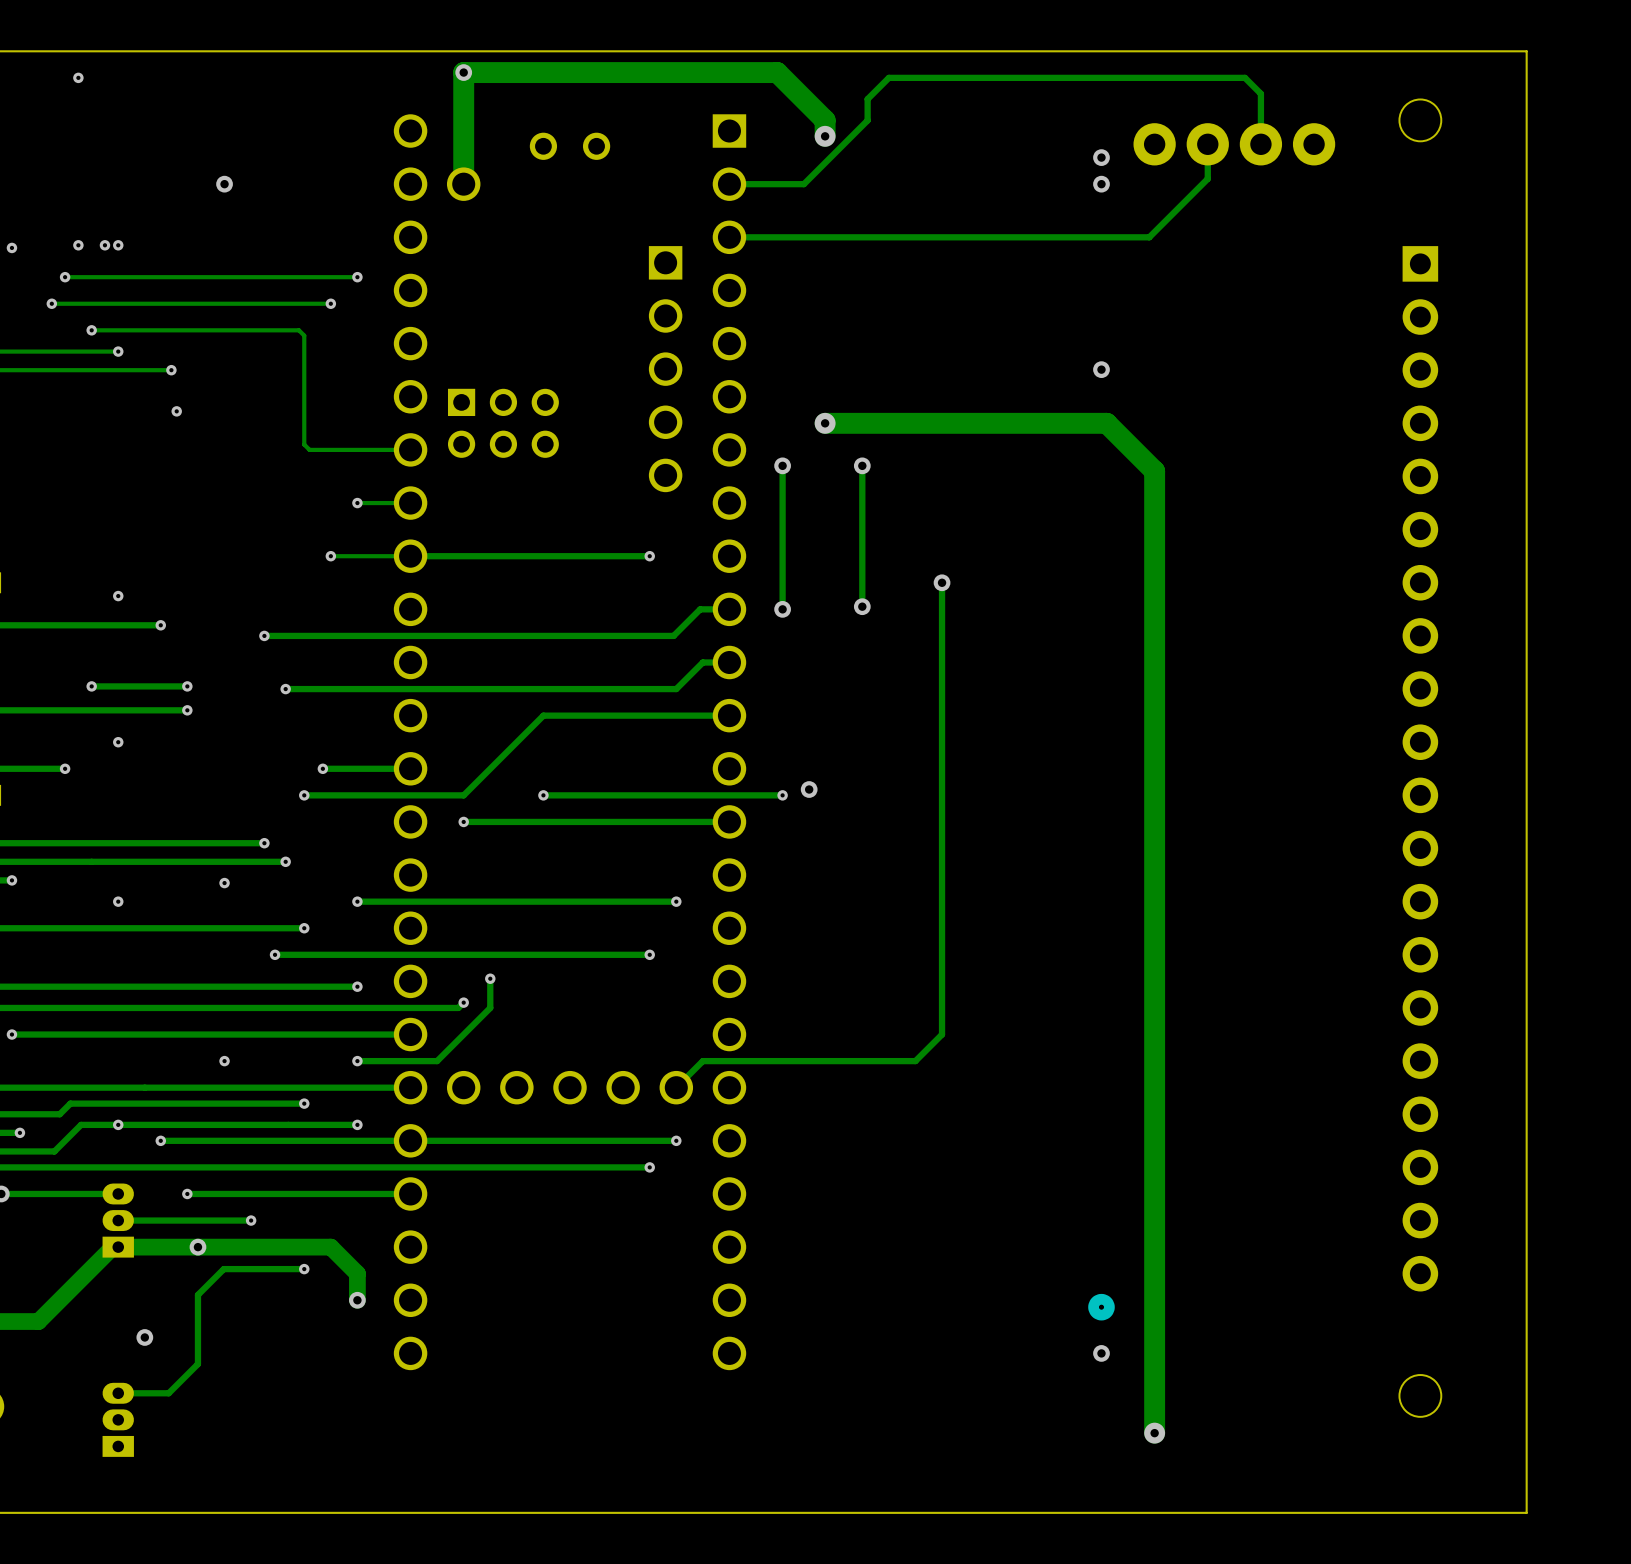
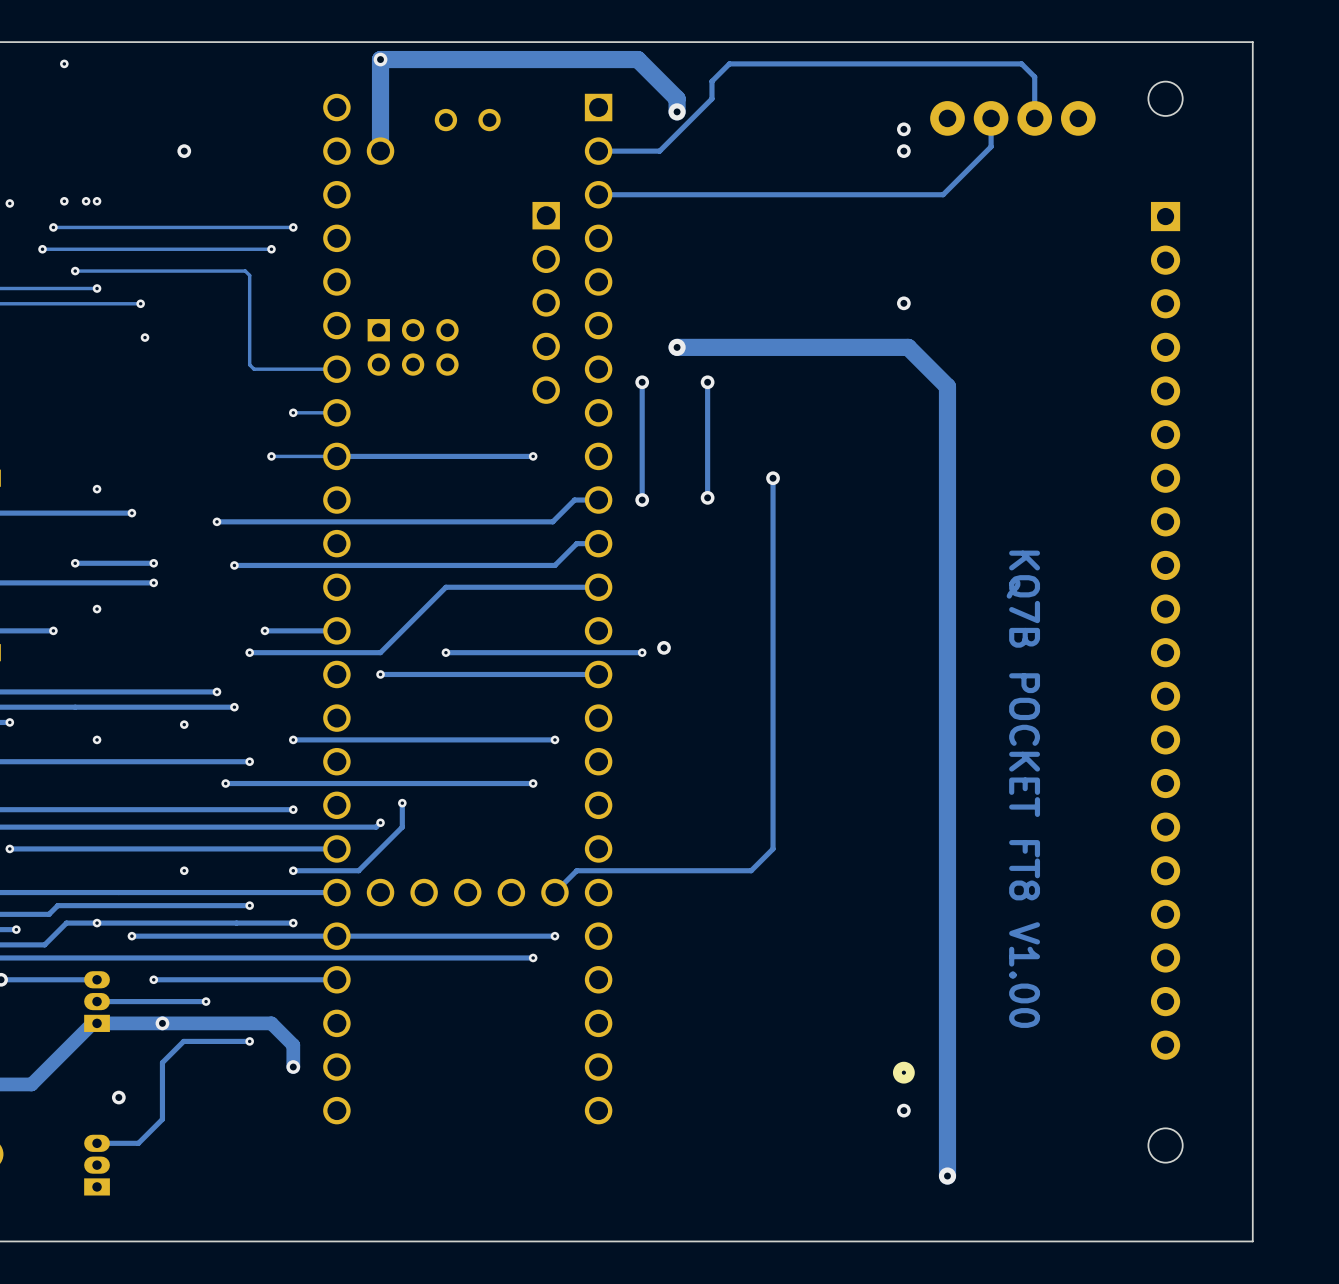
text: none -> KQ7B POCKET FT8 V1.00 (1023, 789)

